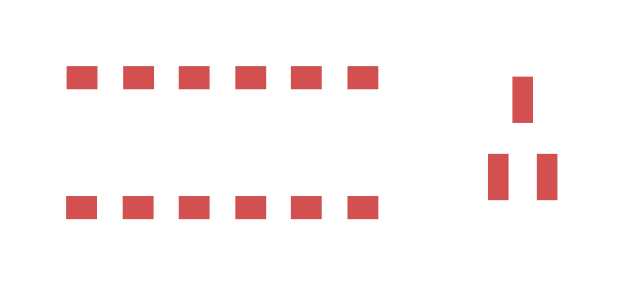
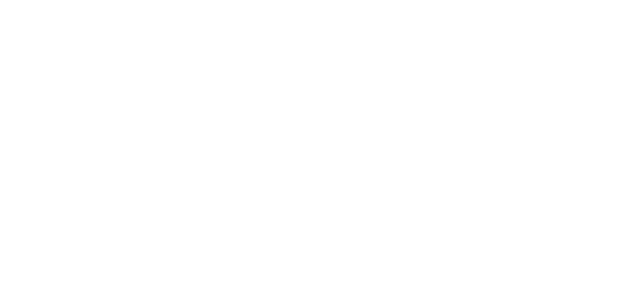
part: (110, 77) -> none
part: (222, 77) -> none
part: (334, 77) -> none
part: (522, 138) -> none
part: (109, 207) -> none
part: (222, 207) -> none
part: (334, 207) -> none

